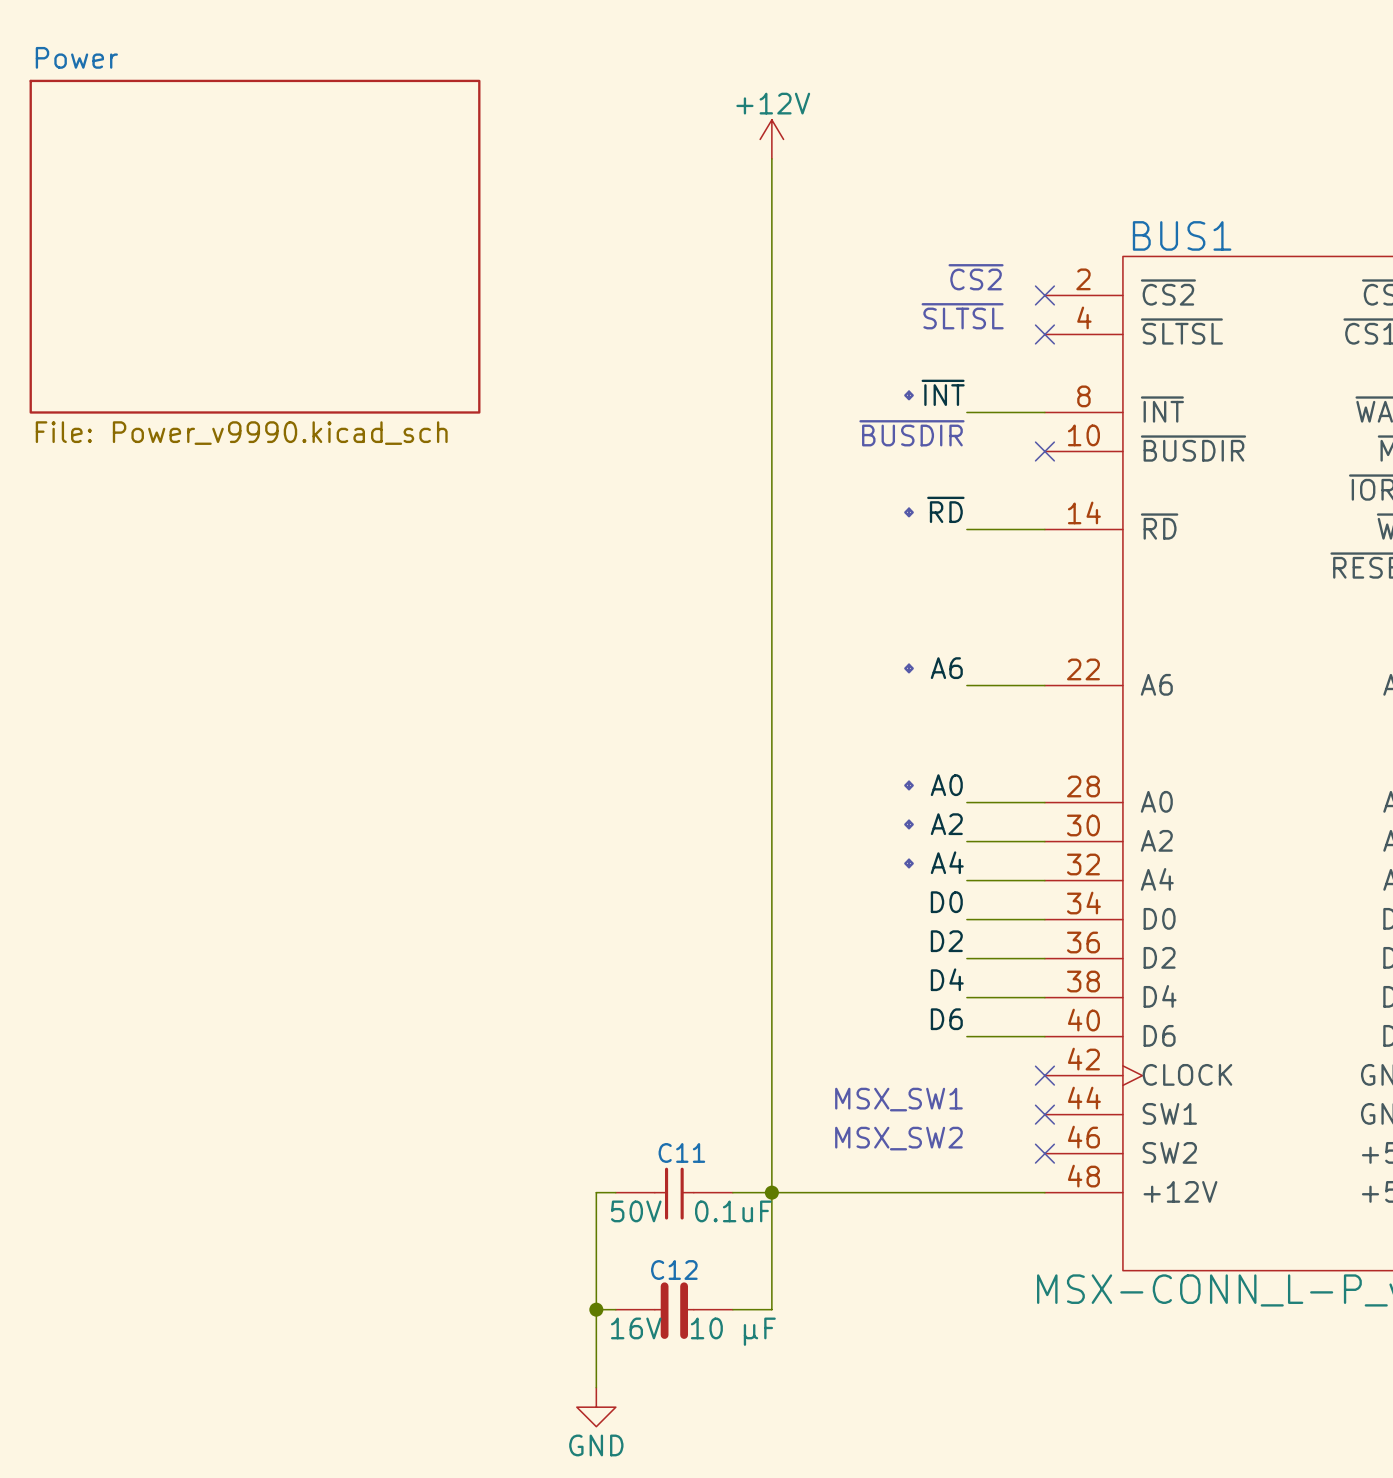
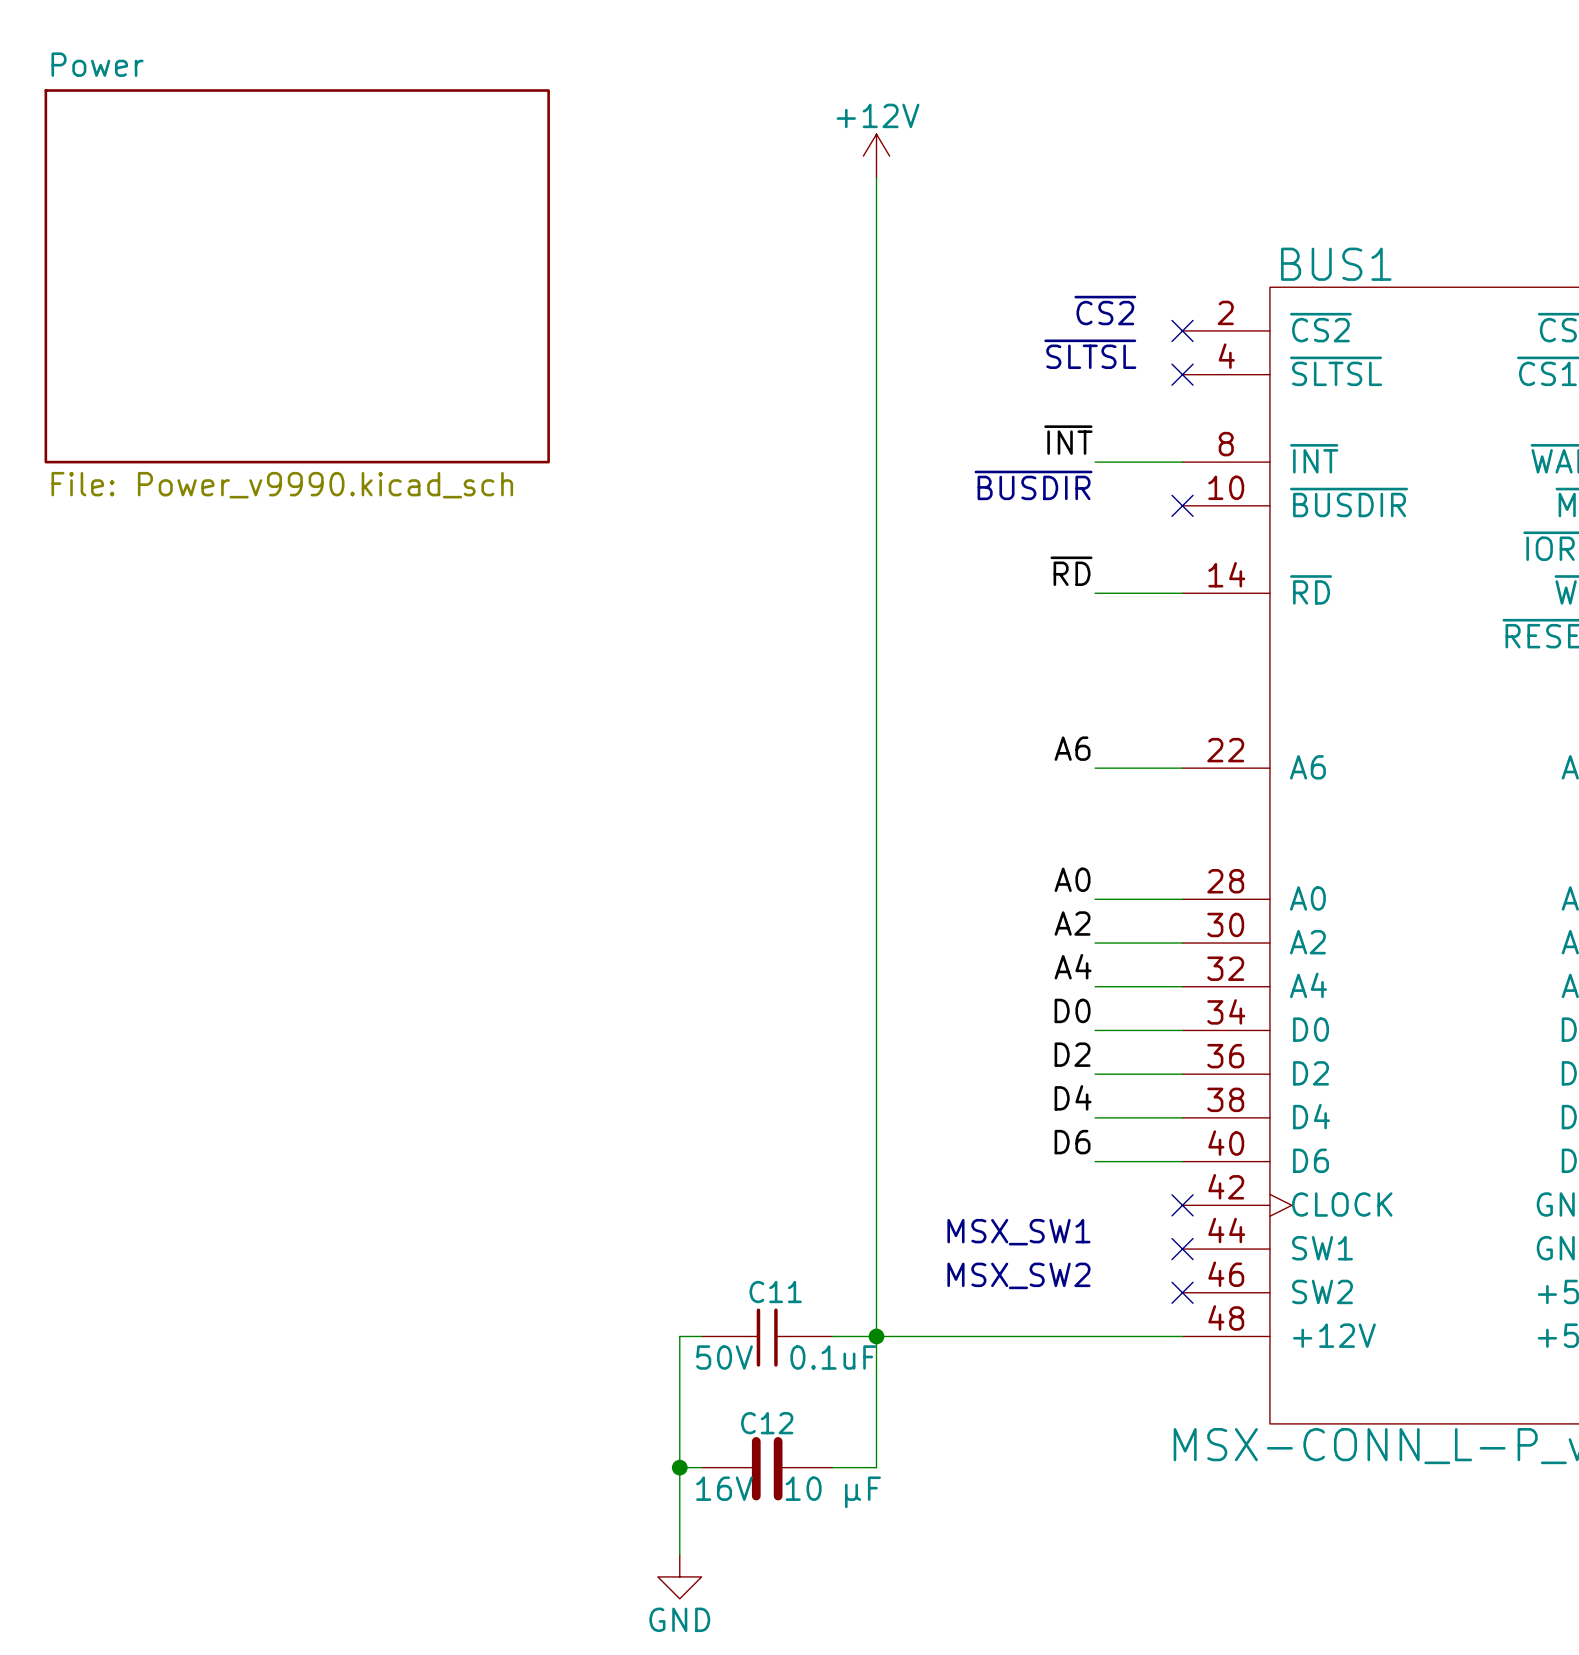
text: . (909, 395) -> none
text: . (909, 512) -> none
text: . (909, 668) -> none
text: . (909, 785) -> none
text: . (909, 824) -> none
text: . (909, 863) -> none

